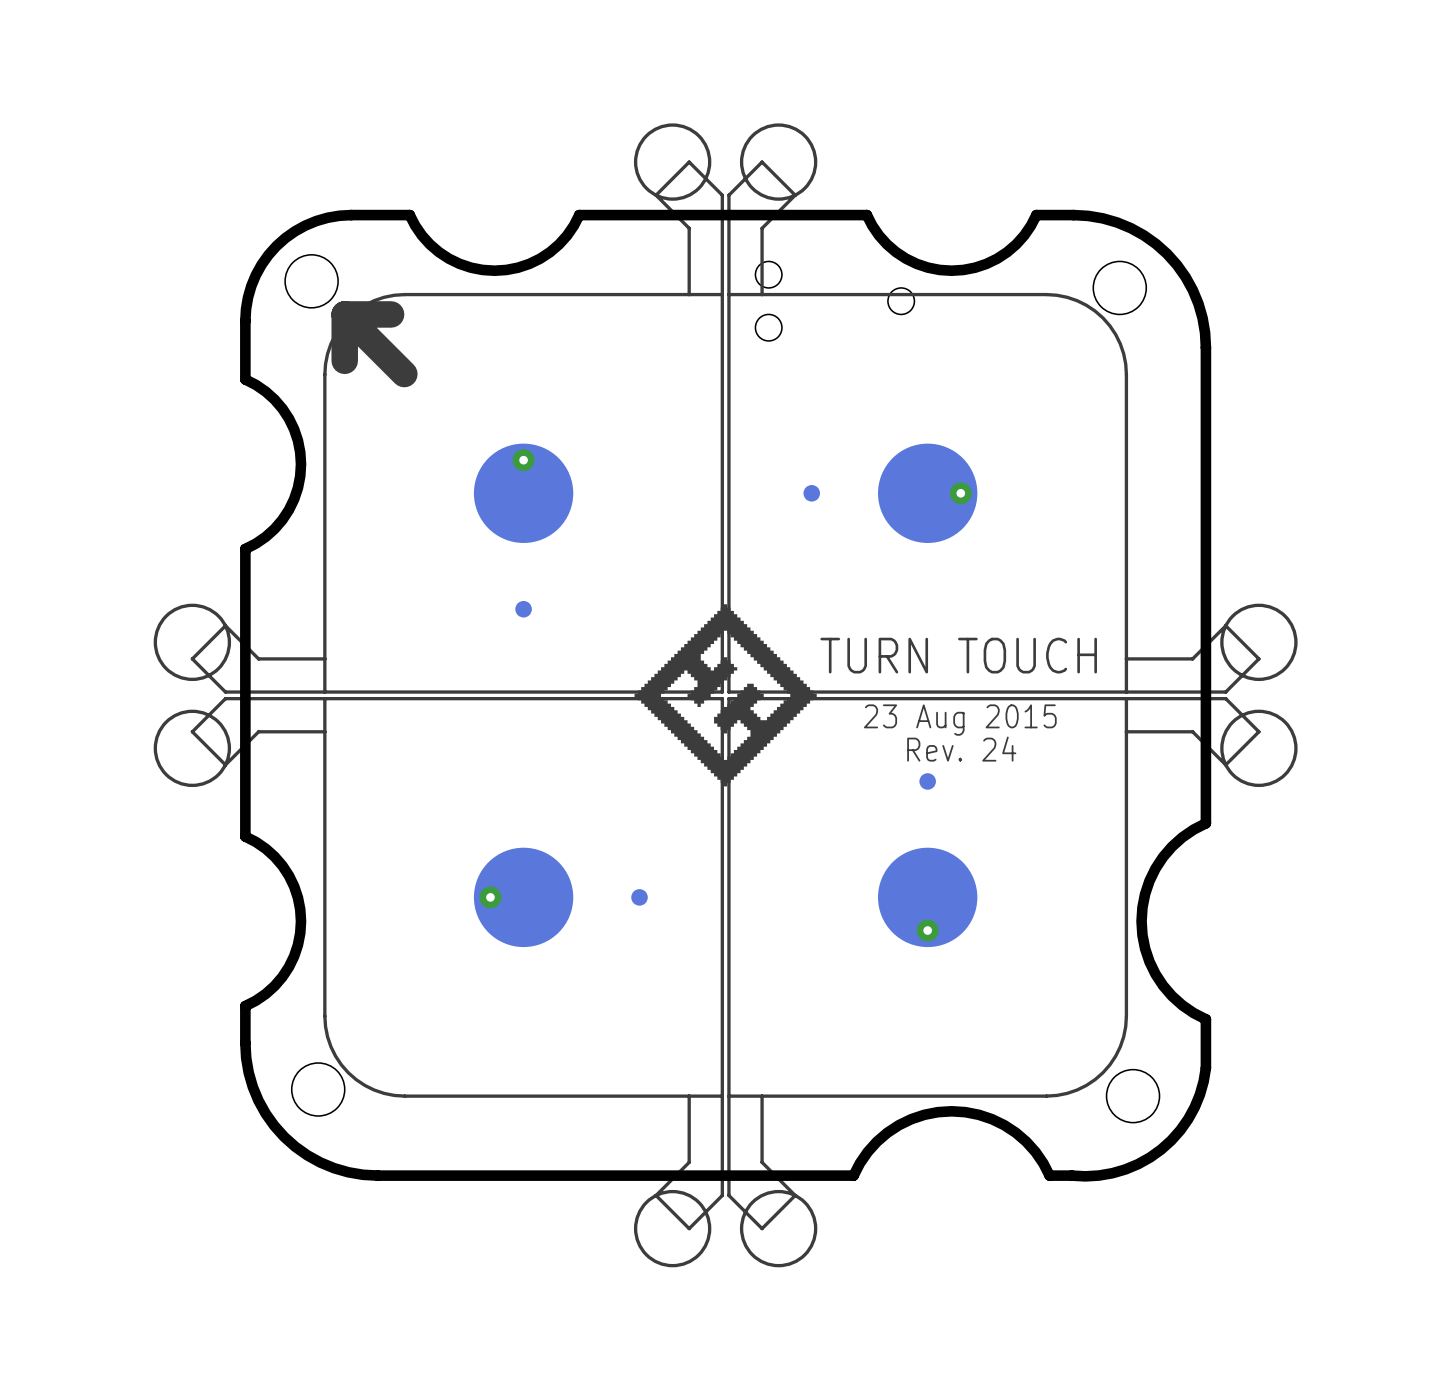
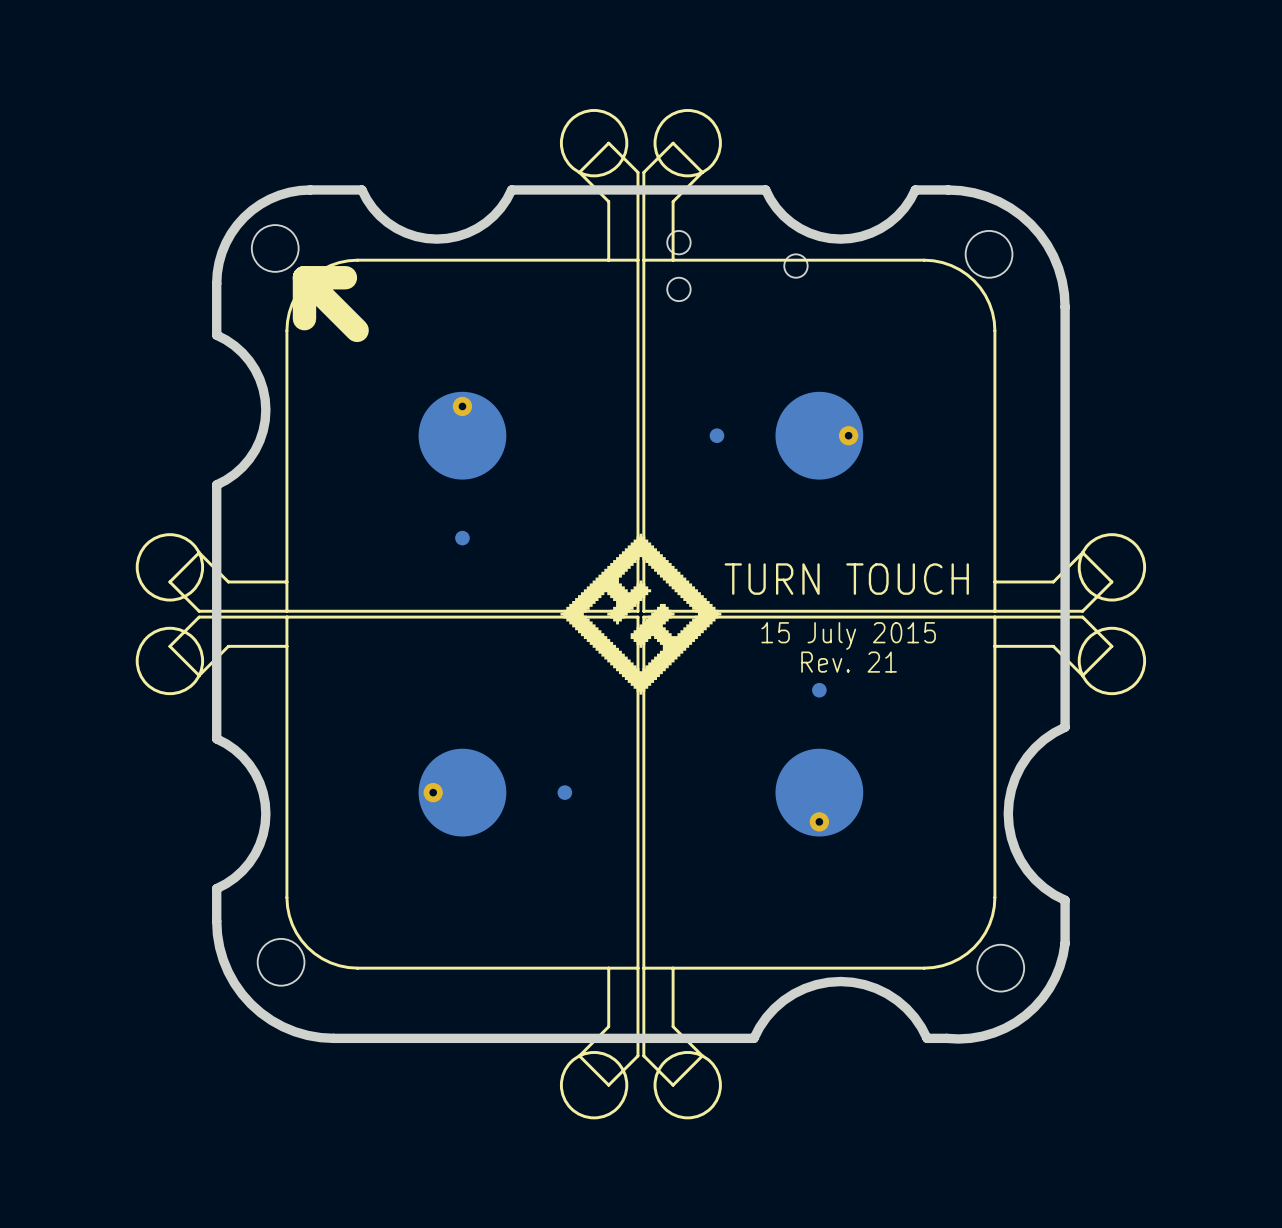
text: 23 Aug 2015 (960, 720) -> 15 July 2015 (848, 635)
text: Rev. 24 (961, 749) -> Rev. 21 (849, 662)

